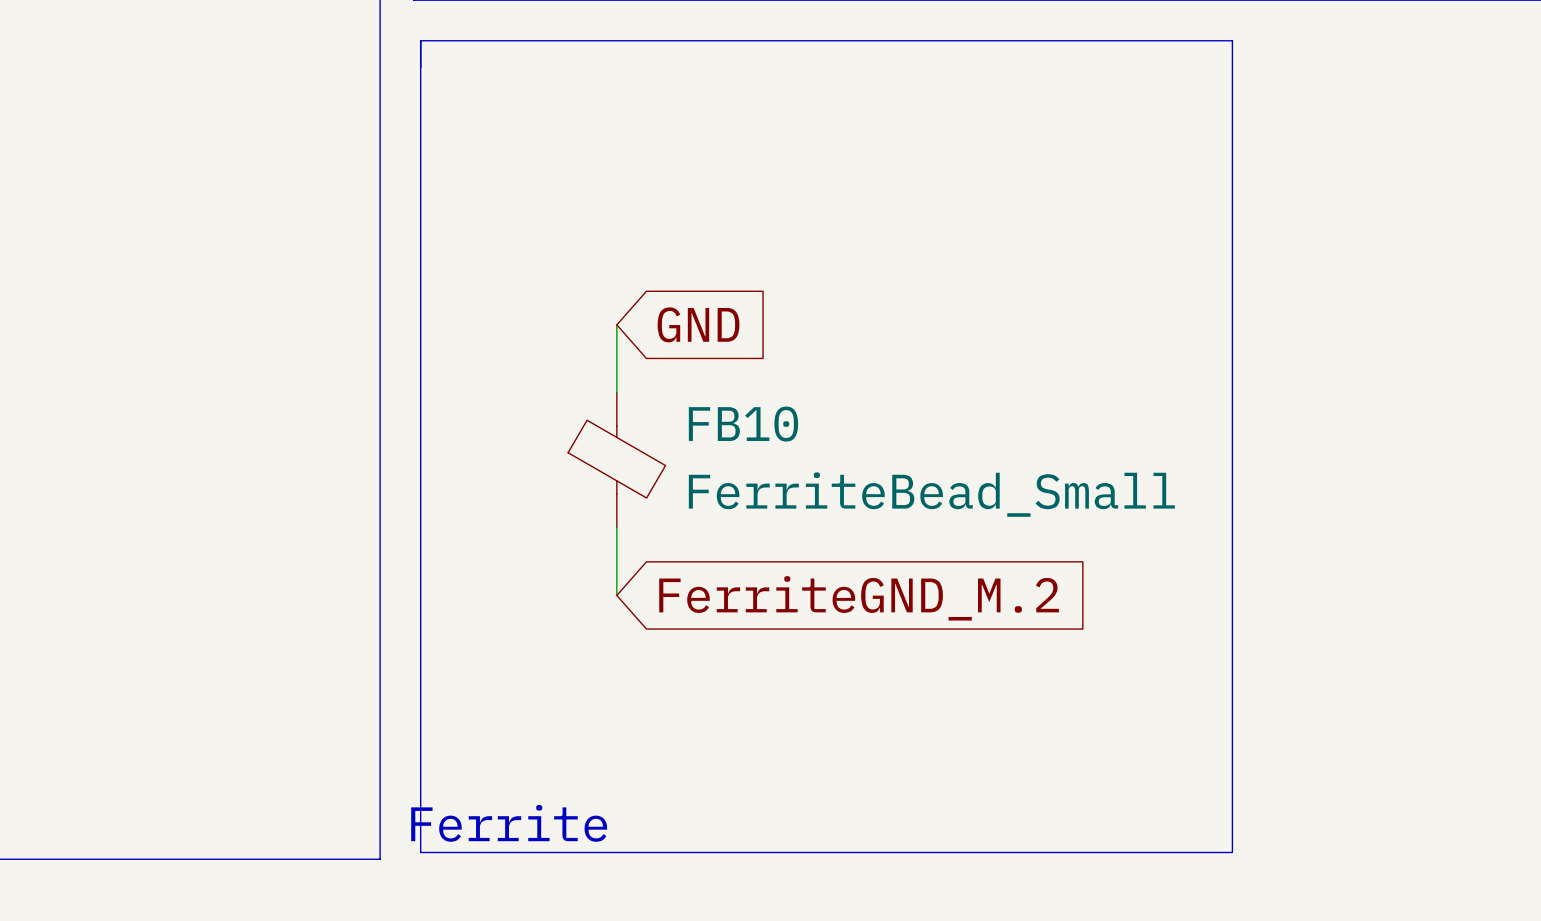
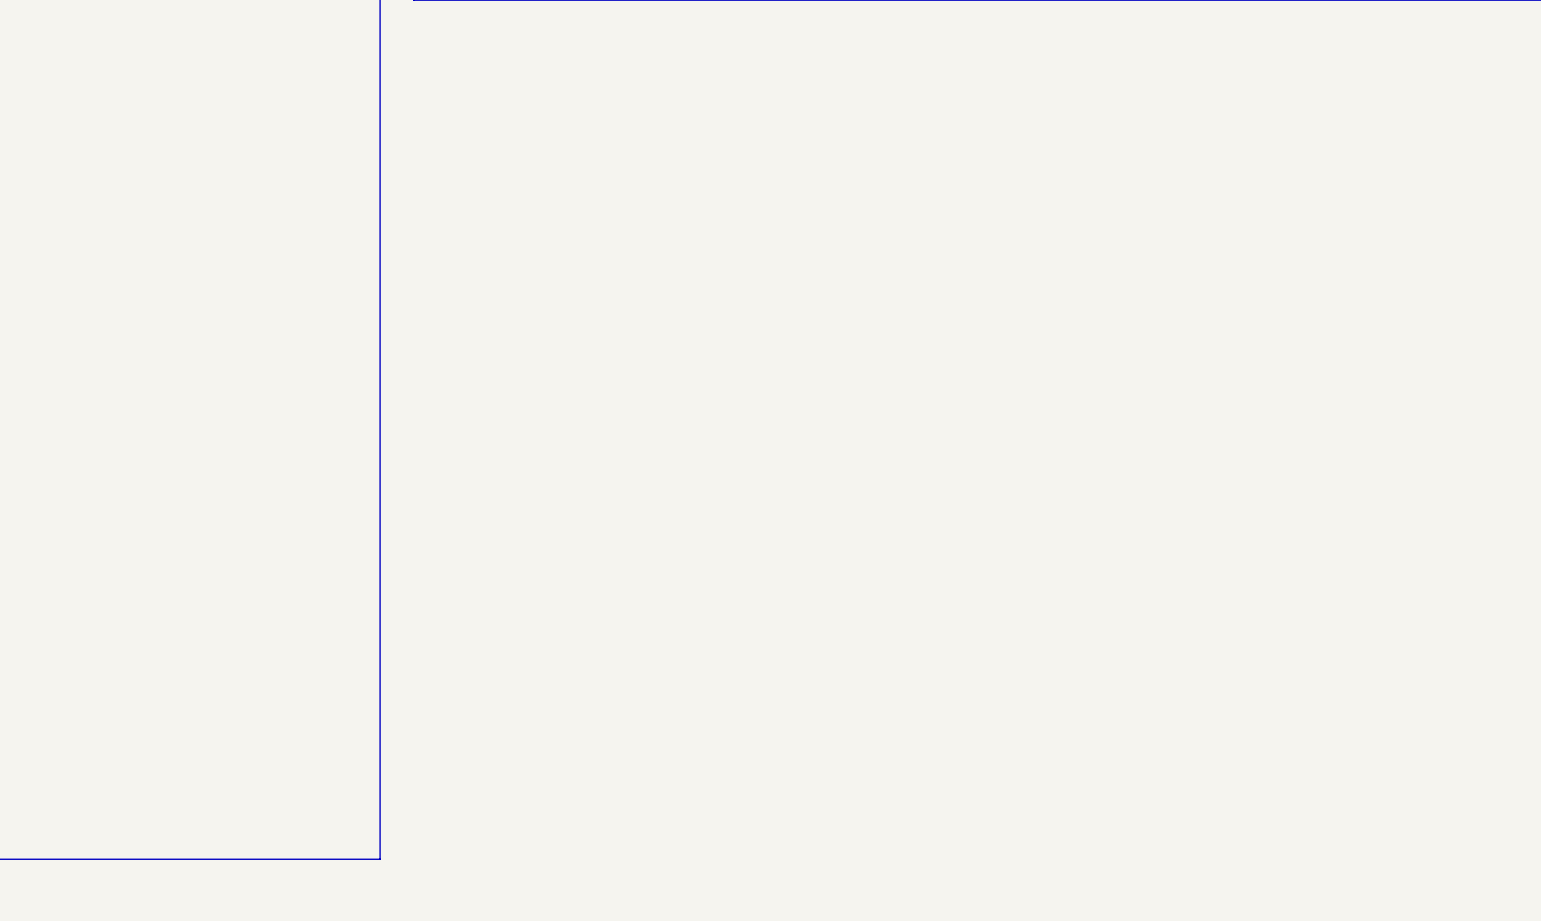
line: (420, 40) (1232, 40) (1232, 852) (420, 852) (420, 40) -> none
wire: (616, 324) (616, 392) -> none
global label: GND (698, 324) -> none
FB10: FerriteBead_Small (616, 460) -> none
wire: (616, 527) (616, 595) -> none
global label: FerriteGND_M.2 (859, 598) -> none
text: Ferrite (509, 823) -> none

